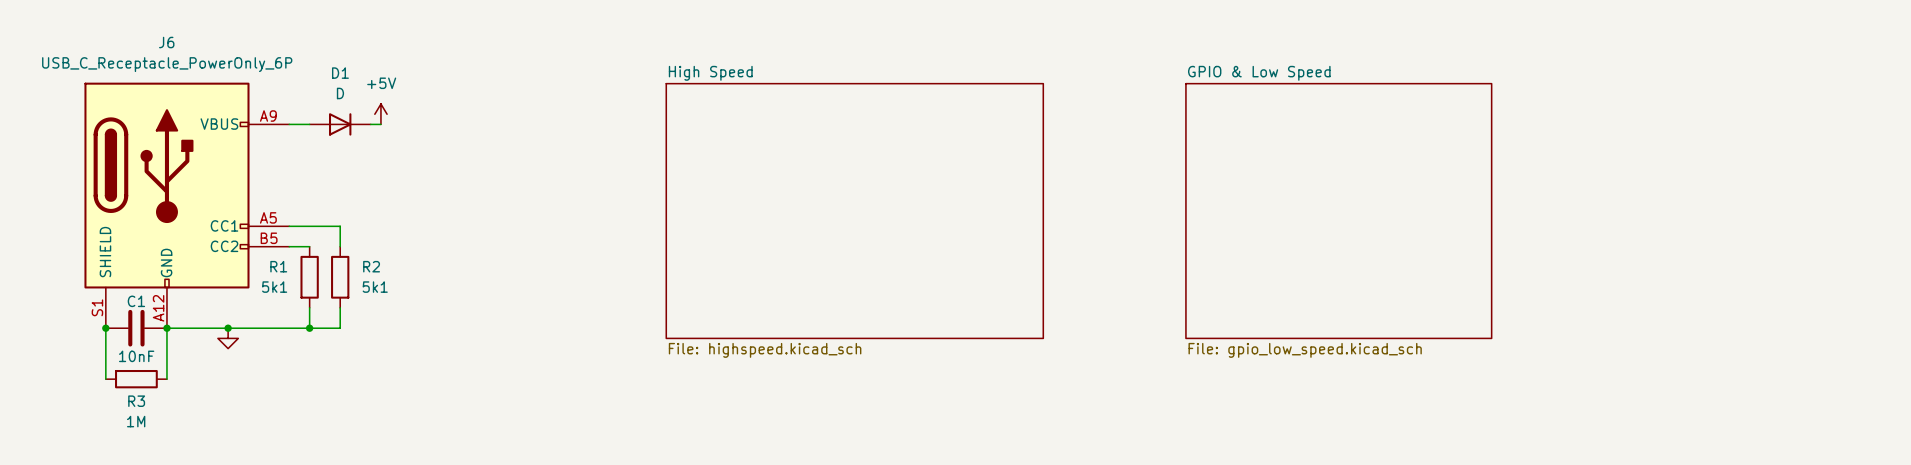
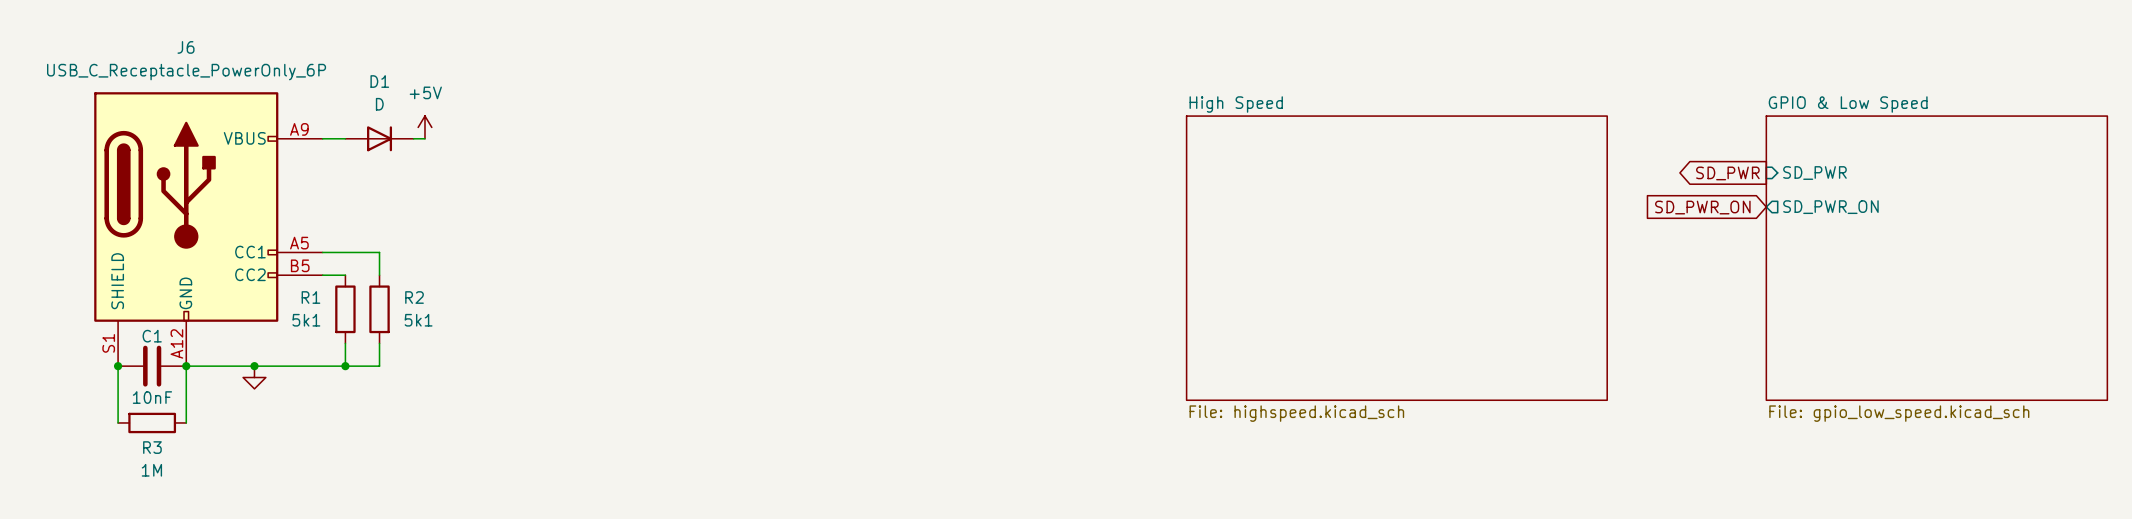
global label: none -> SD_PWR (1727, 173)
sheet pin: none -> SD_PWR (1814, 173)
sheet pin: none -> SD_PWR_ON (1830, 207)
global label: none -> SD_PWR_ON (1702, 207)
sheet High Speed: File: highspeed.kicad_sch (854, 211) -> none
sheet GPIO & Low Speed: File: gpio_low_speed.kicad_sch (1338, 211) -> none
sheet High Speed: none -> File: highspeed.kicad_sch (1396, 258)
sheet GPIO & Low Speed: none -> File: gpio_low_speed.kicad_sch (1936, 258)

